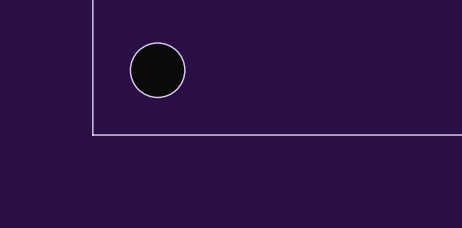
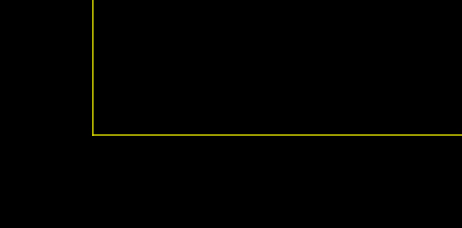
part: (157, 70) -> none

